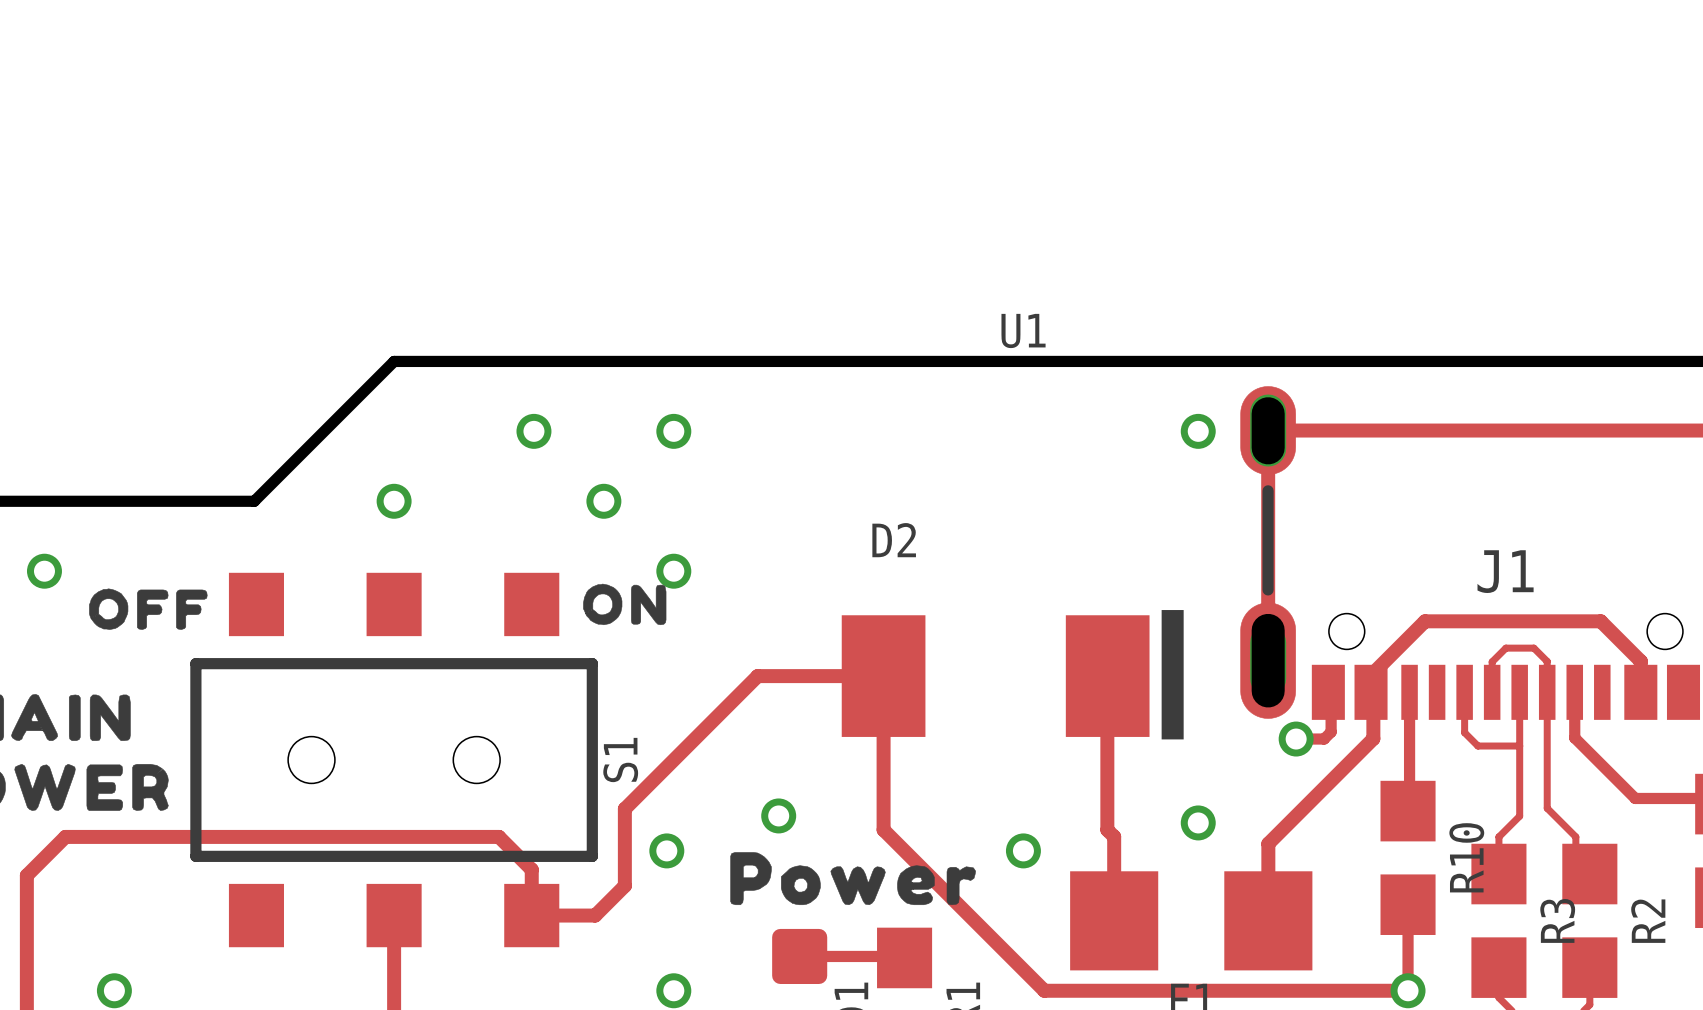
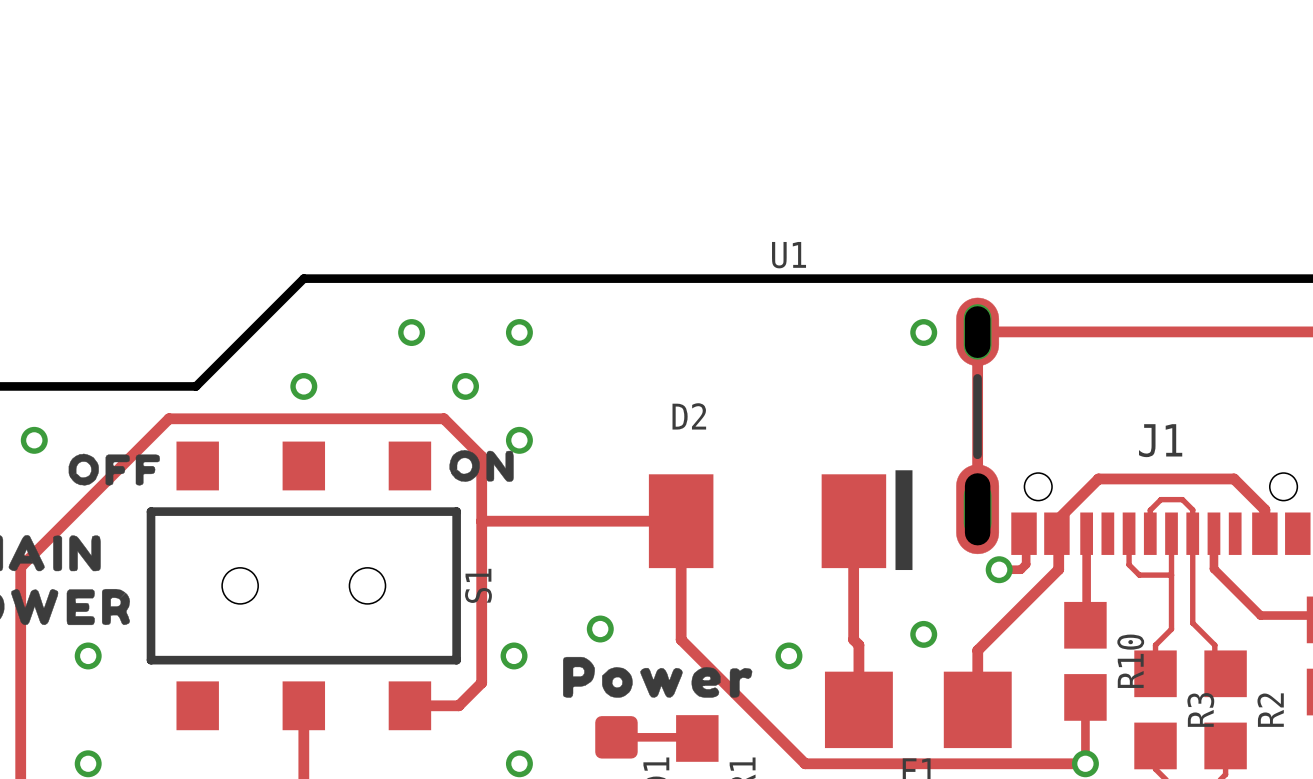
track: (757, 676) (624, 808) -> (584, 521) (481, 521)
via: none -> (88, 655)
track: (26, 875) (65, 836) (499, 836) (531, 869) (531, 915) -> (20, 674) (20, 567) (169, 418) (443, 418) (481, 456) (481, 623)

